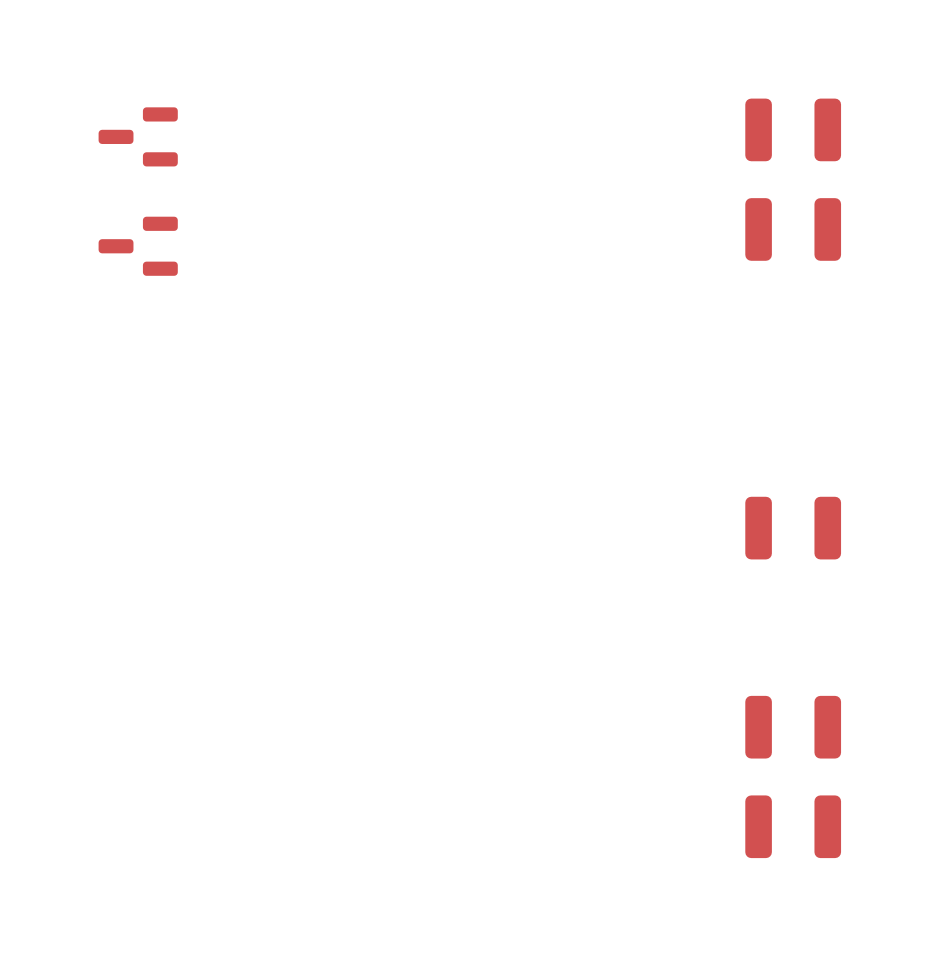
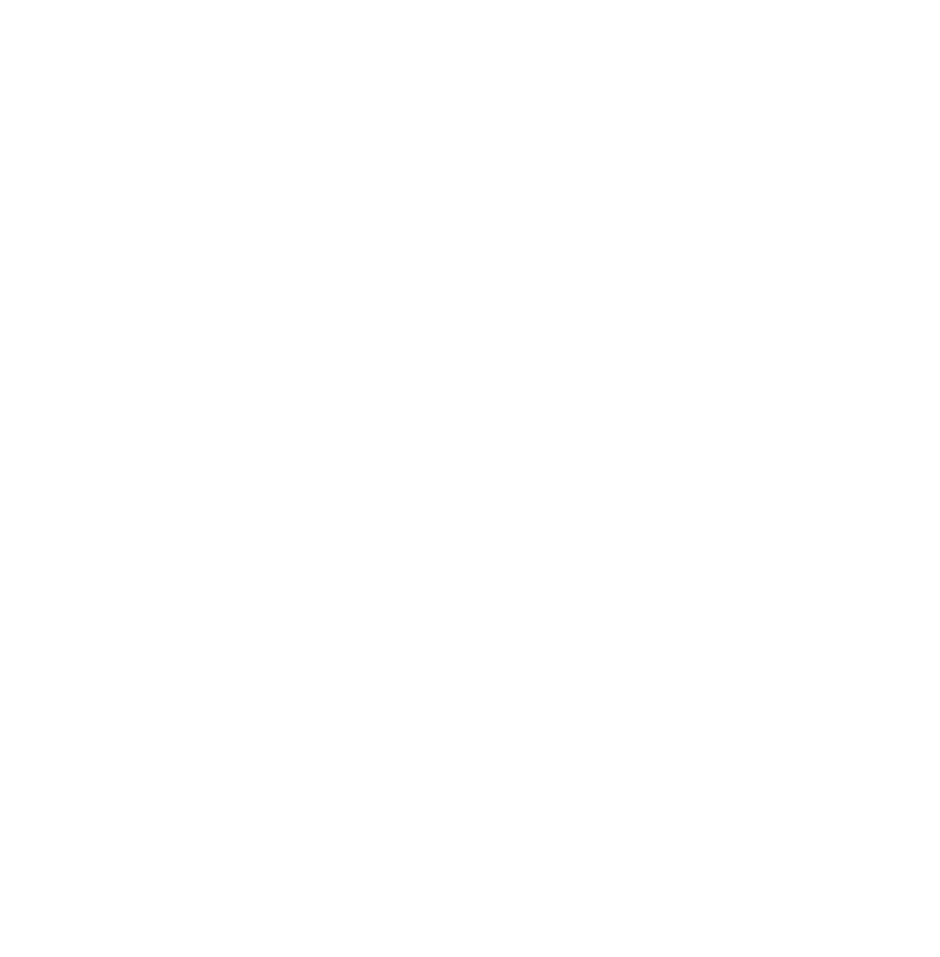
part: (793, 129) -> none
part: (138, 136) -> none
part: (793, 229) -> none
part: (138, 246) -> none
part: (793, 528) -> none
part: (793, 727) -> none
part: (793, 826) -> none

